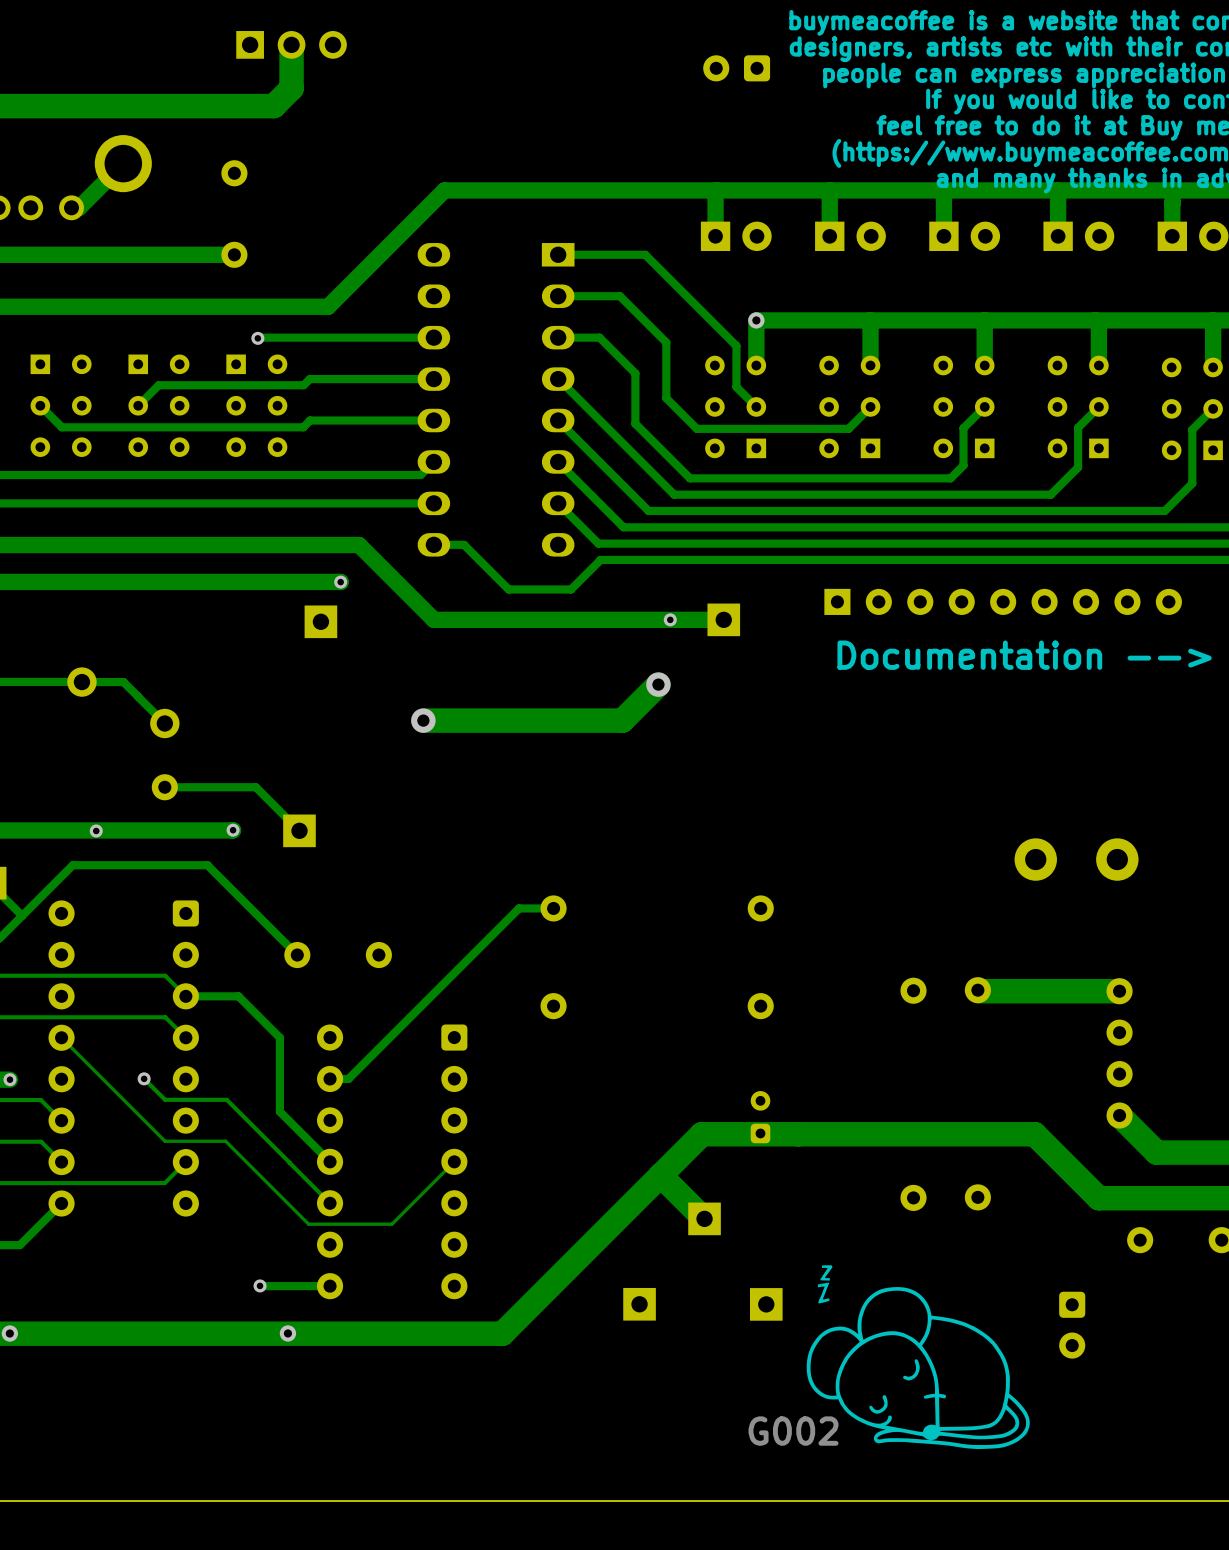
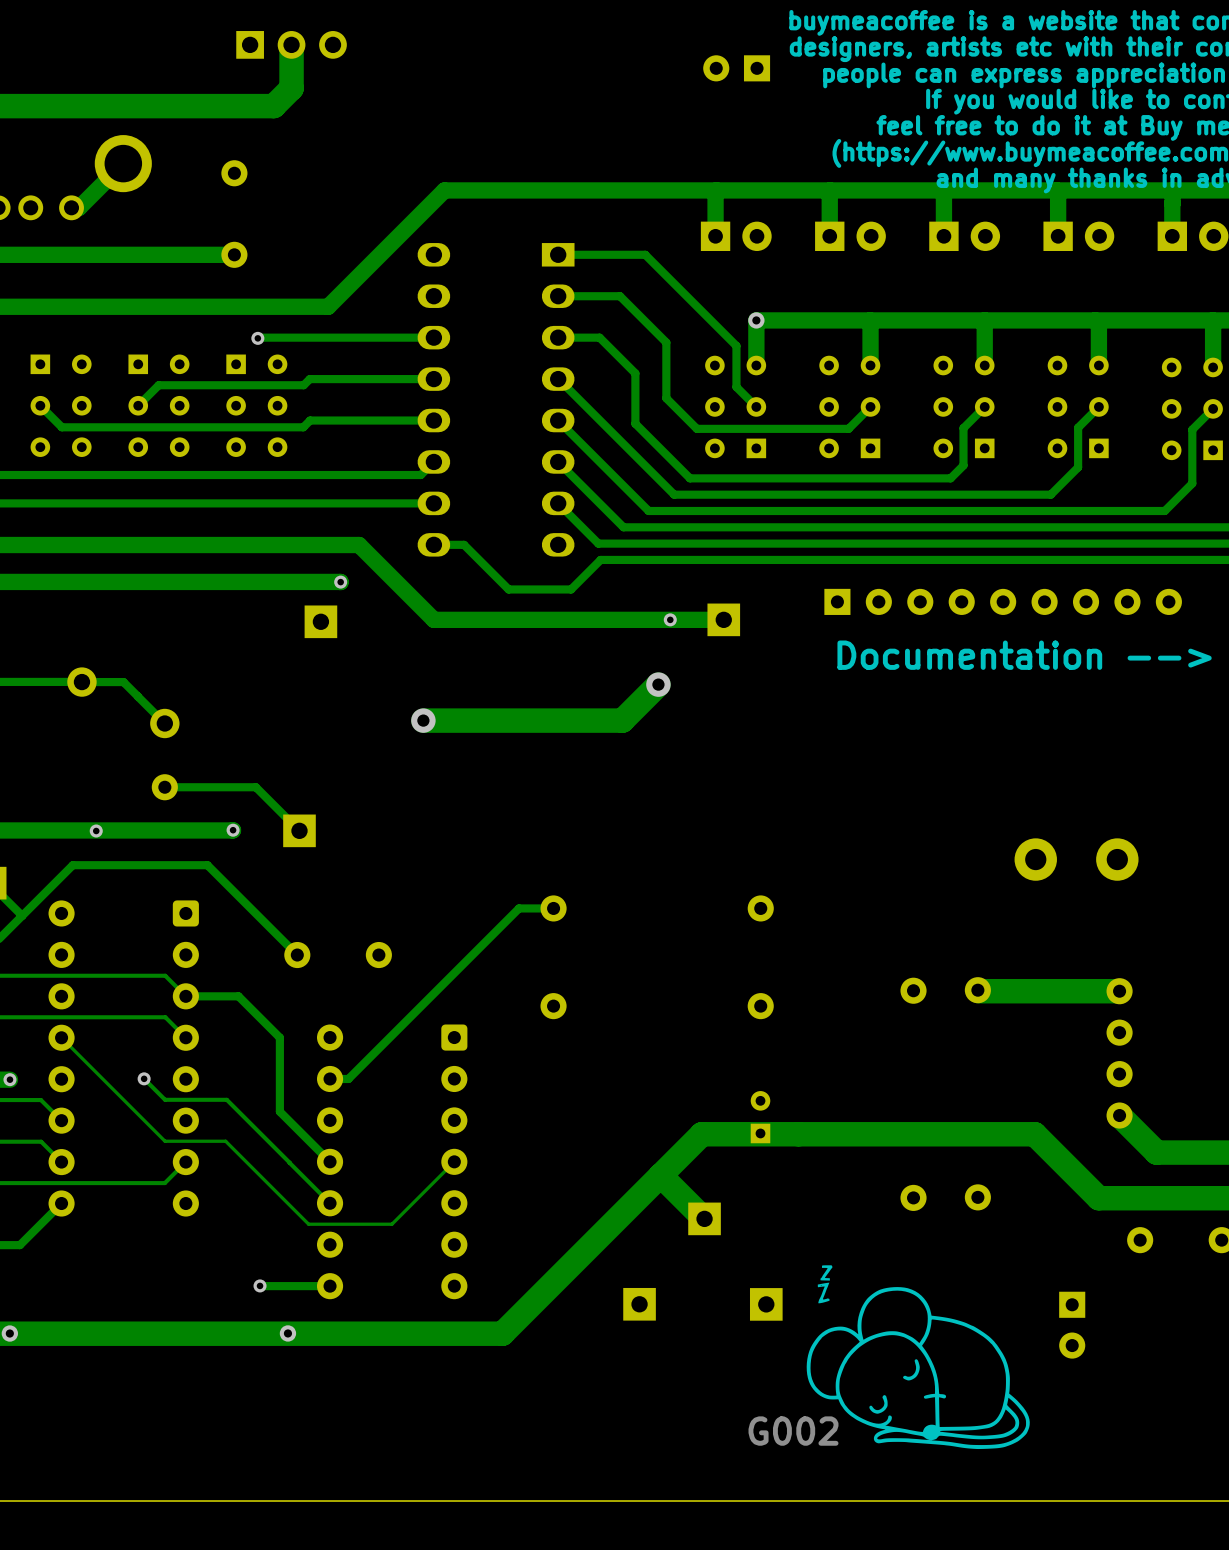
part footprint: [703, 55, 771, 82] -> [703, 55, 771, 82]
part footprint: [750, 1091, 771, 1144] -> [750, 1091, 771, 1144]
part footprint: [1059, 1291, 1086, 1359] -> [1059, 1291, 1086, 1359]

